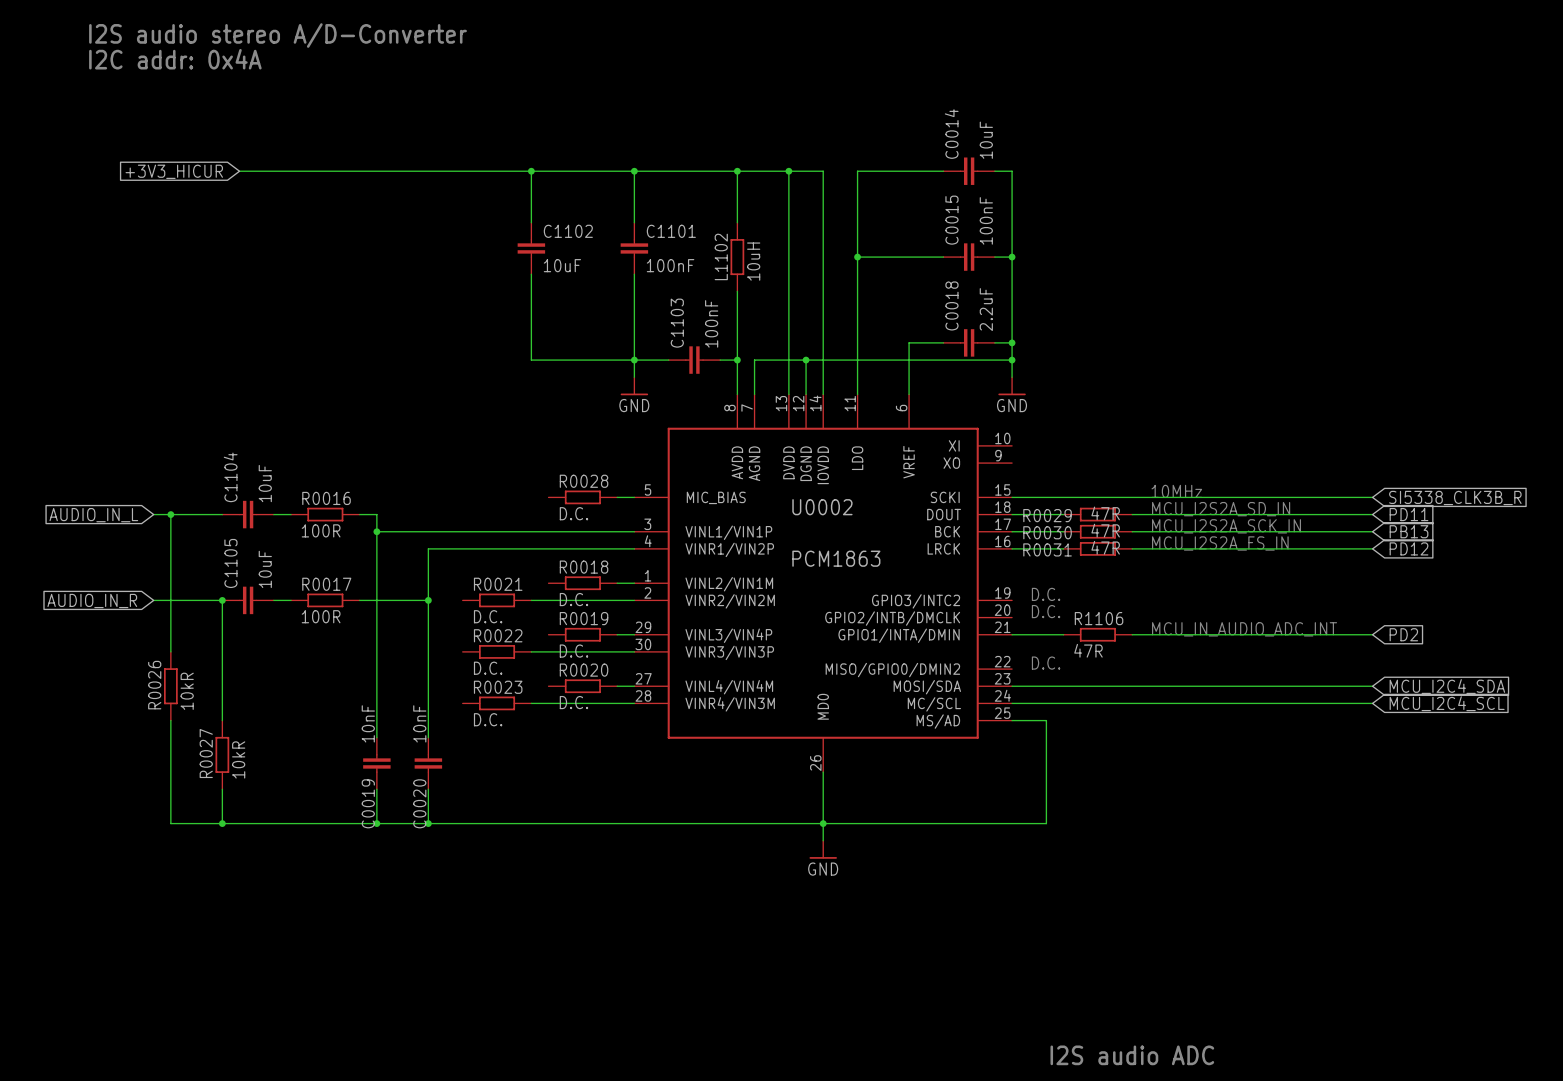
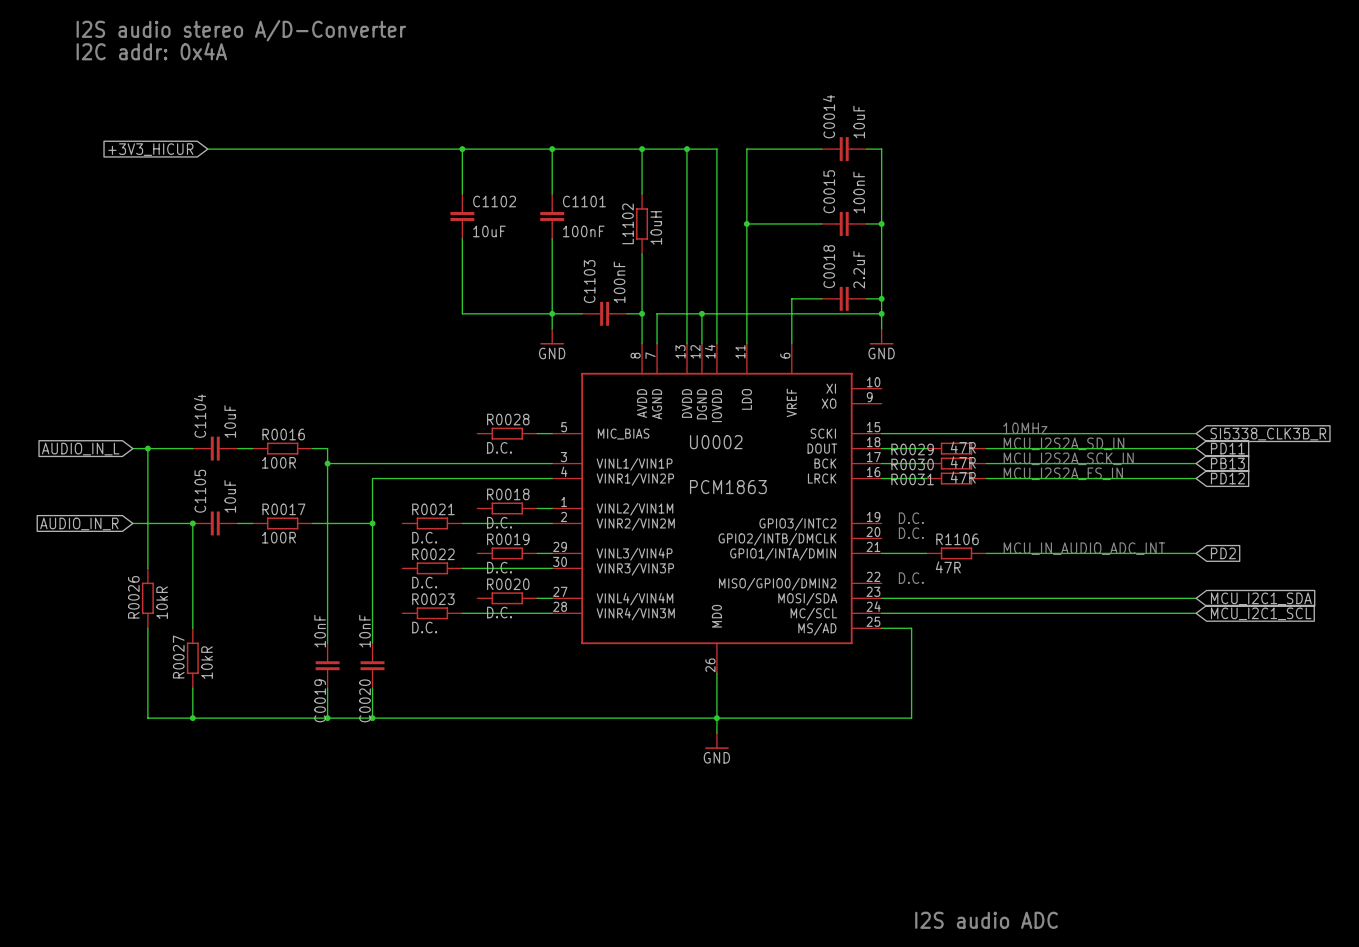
global label: MCU_I2C4_SDA (1447, 686) -> MCU_I2C1_SDA (1261, 598)
global label: MCU_I2C4_SCL (1447, 703) -> MCU_I2C1_SCL (1261, 613)

